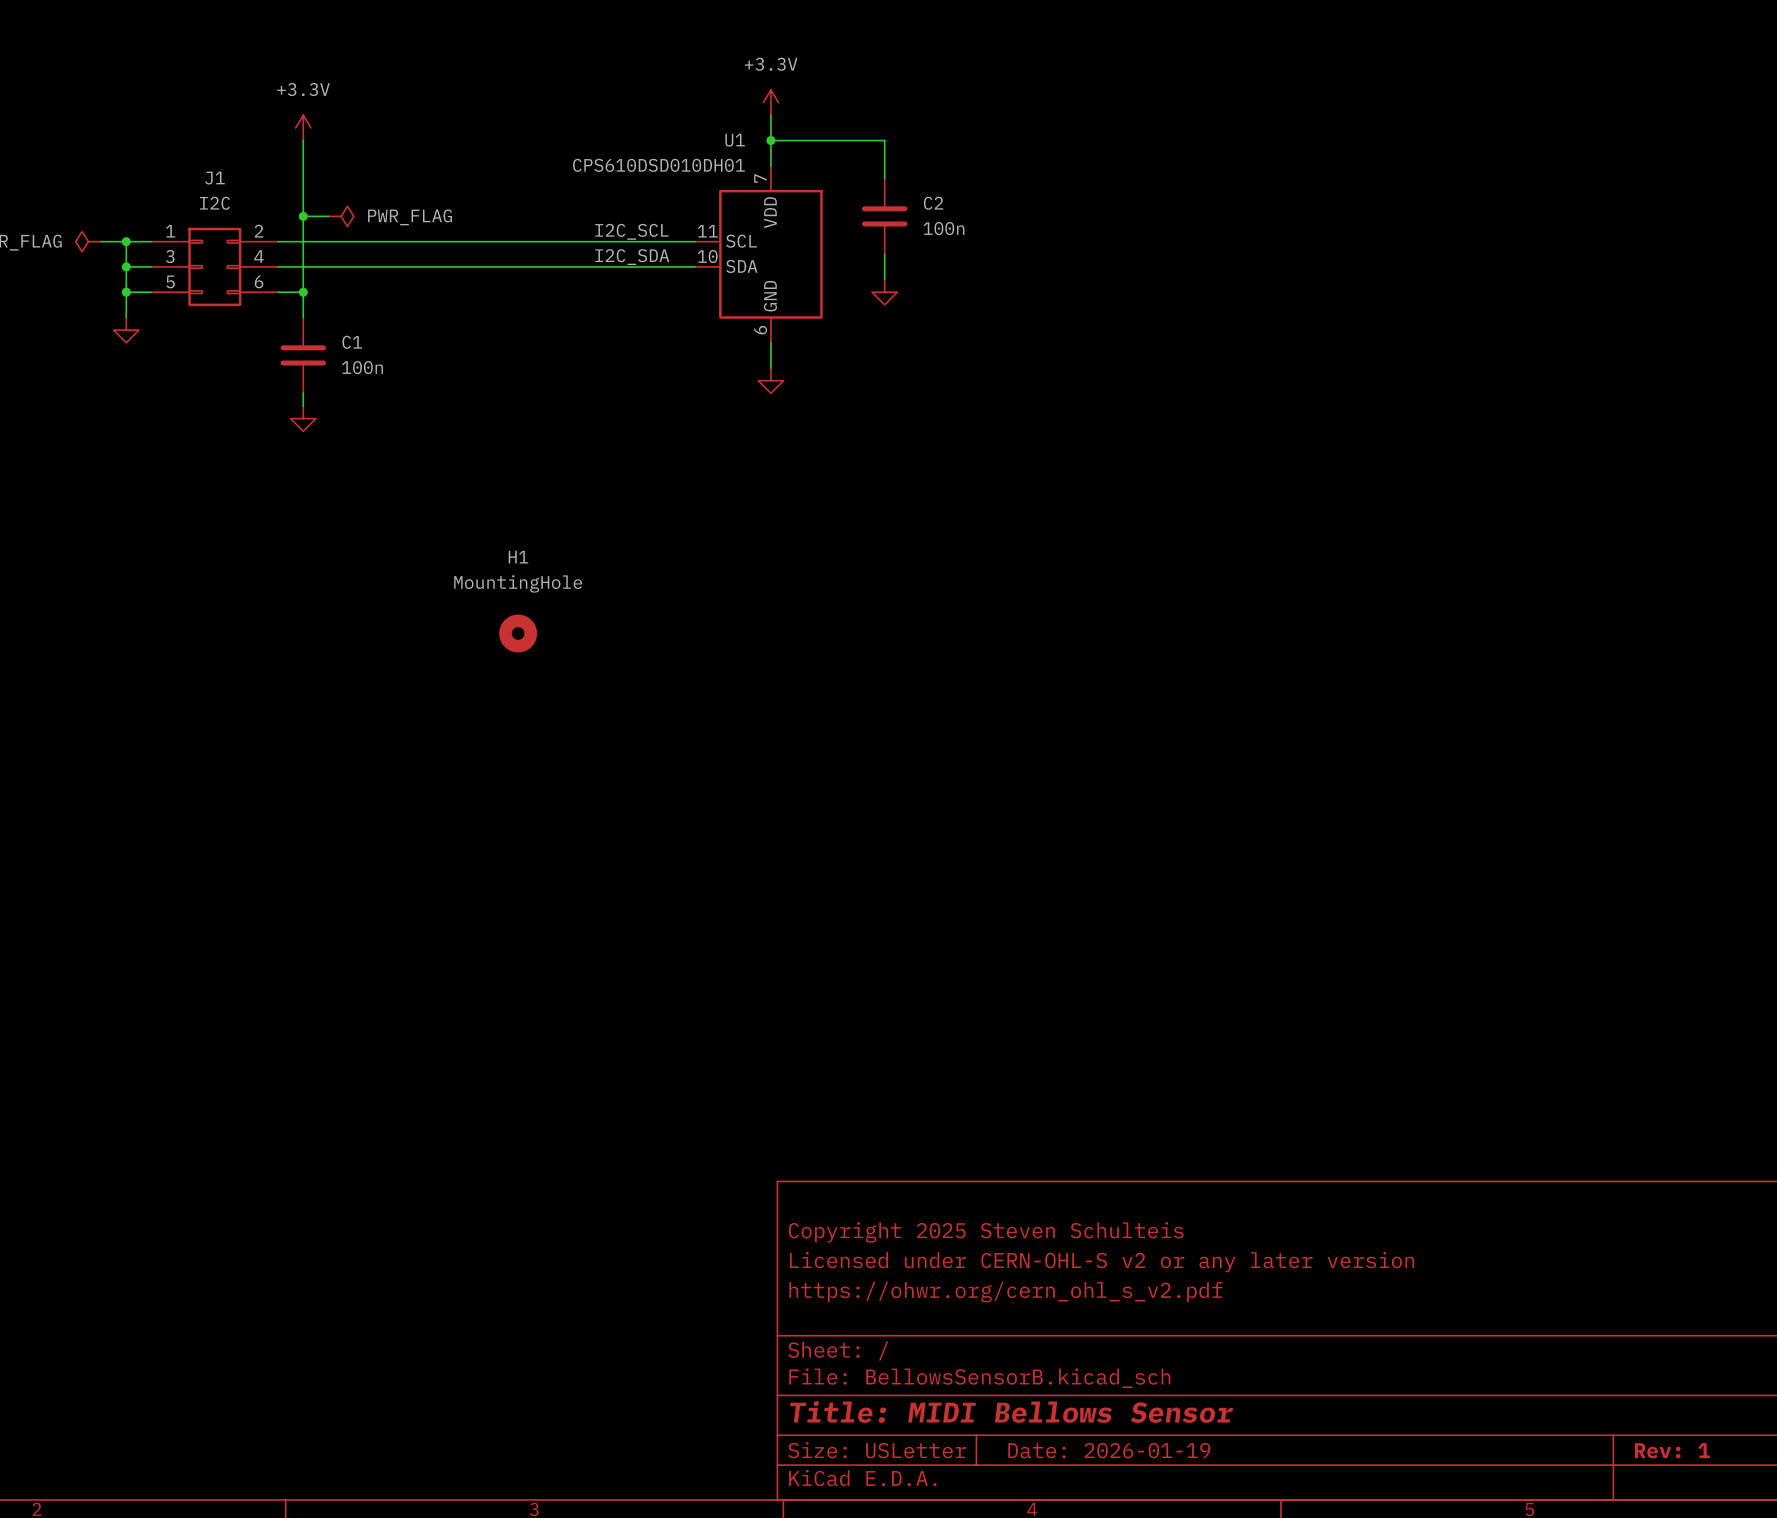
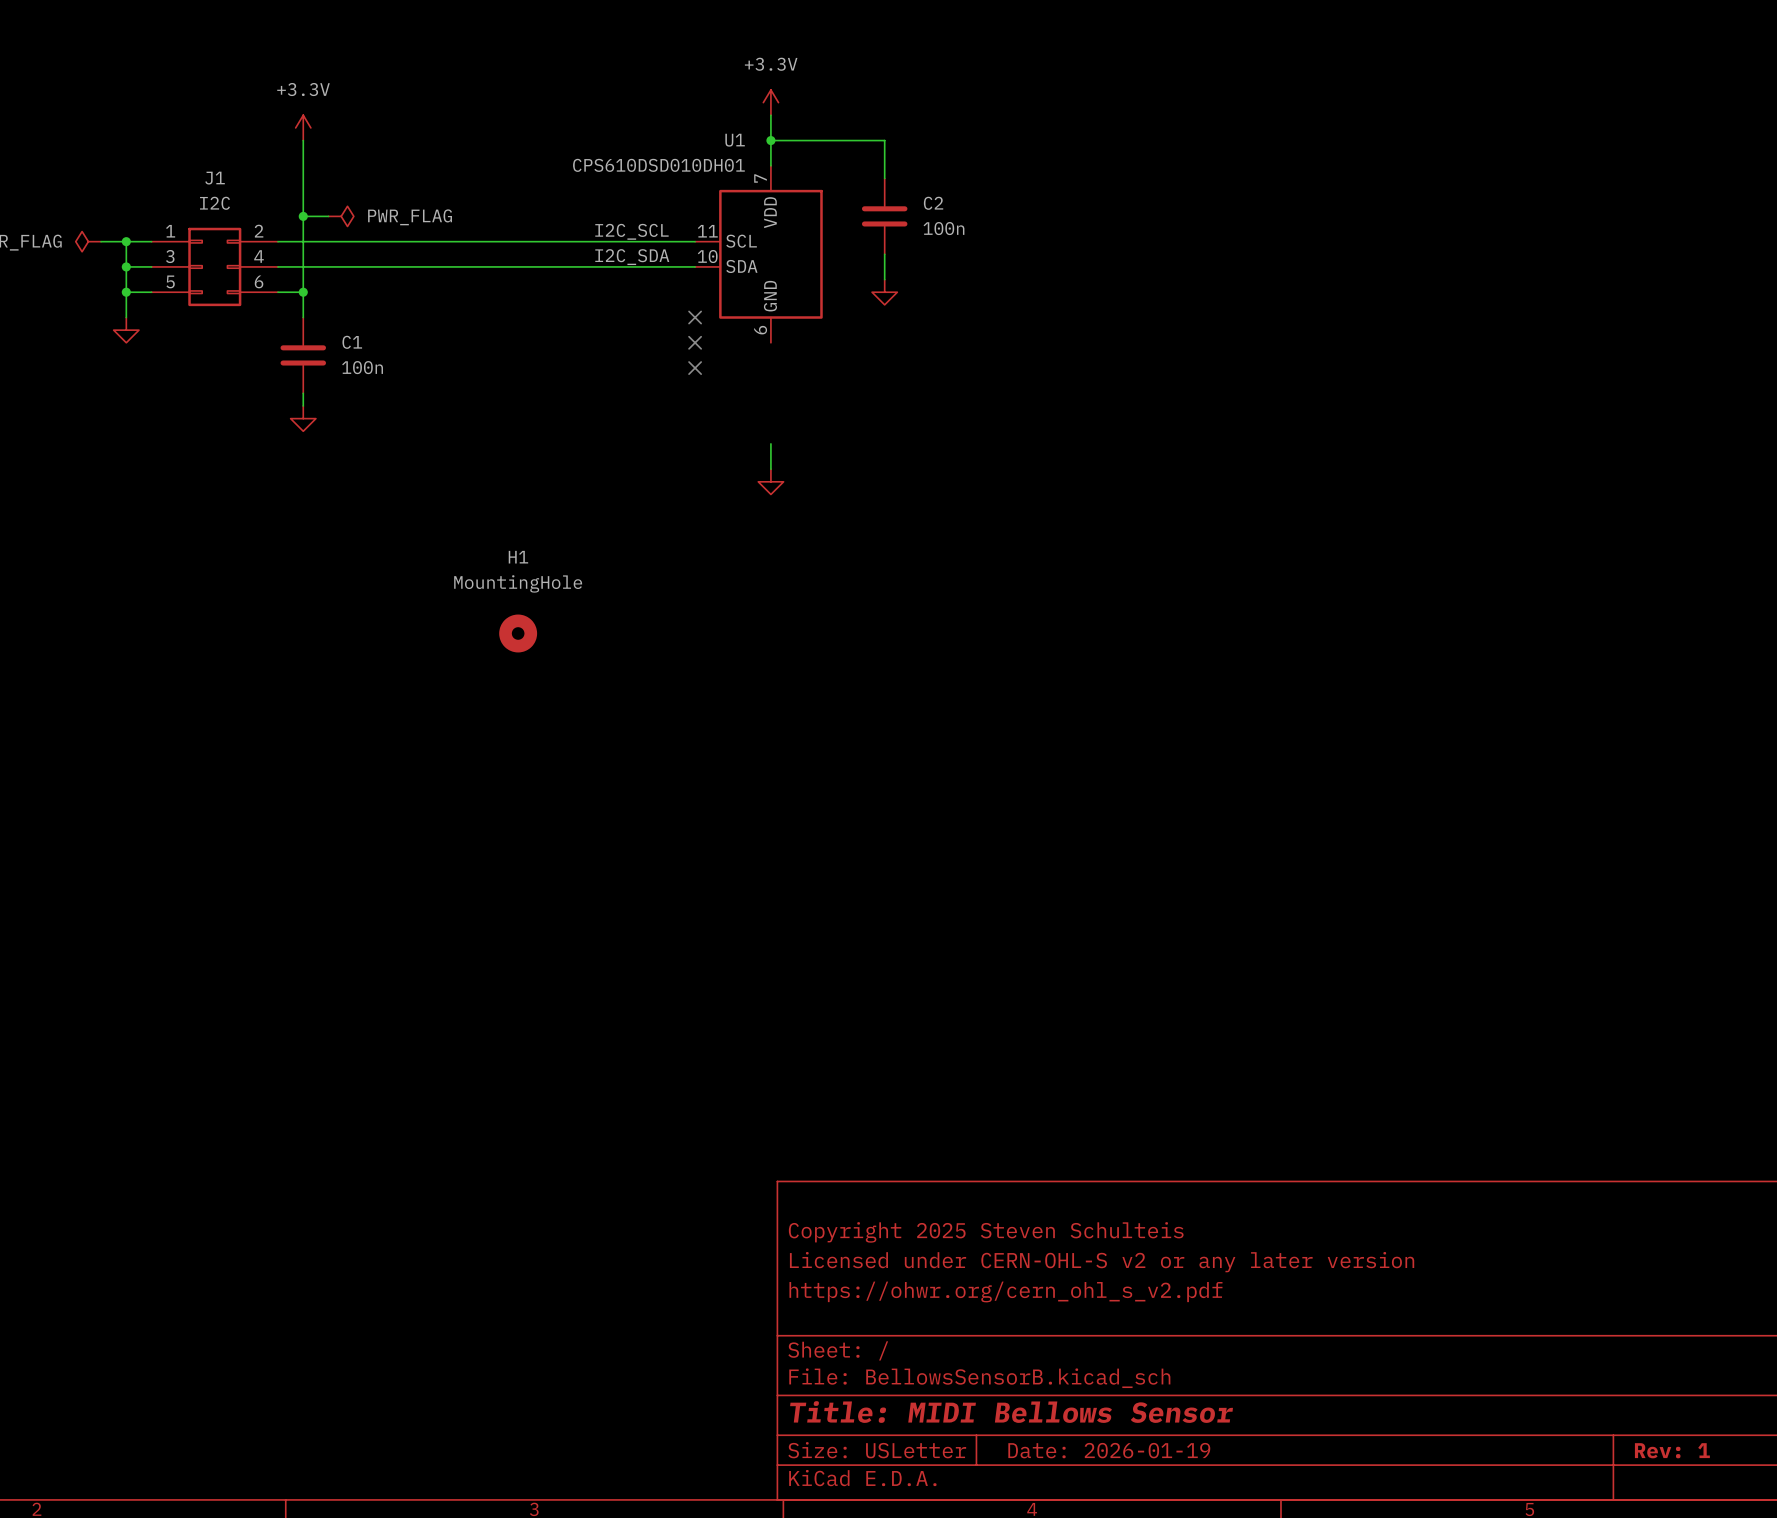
no-connect mark: none -> (695, 317)
no-connect mark: none -> (695, 342)
wire: (770, 342) (770, 368) -> (770, 443) (770, 469)
no-connect mark: none -> (695, 368)
power symbol position: (770, 380) -> (770, 481)

